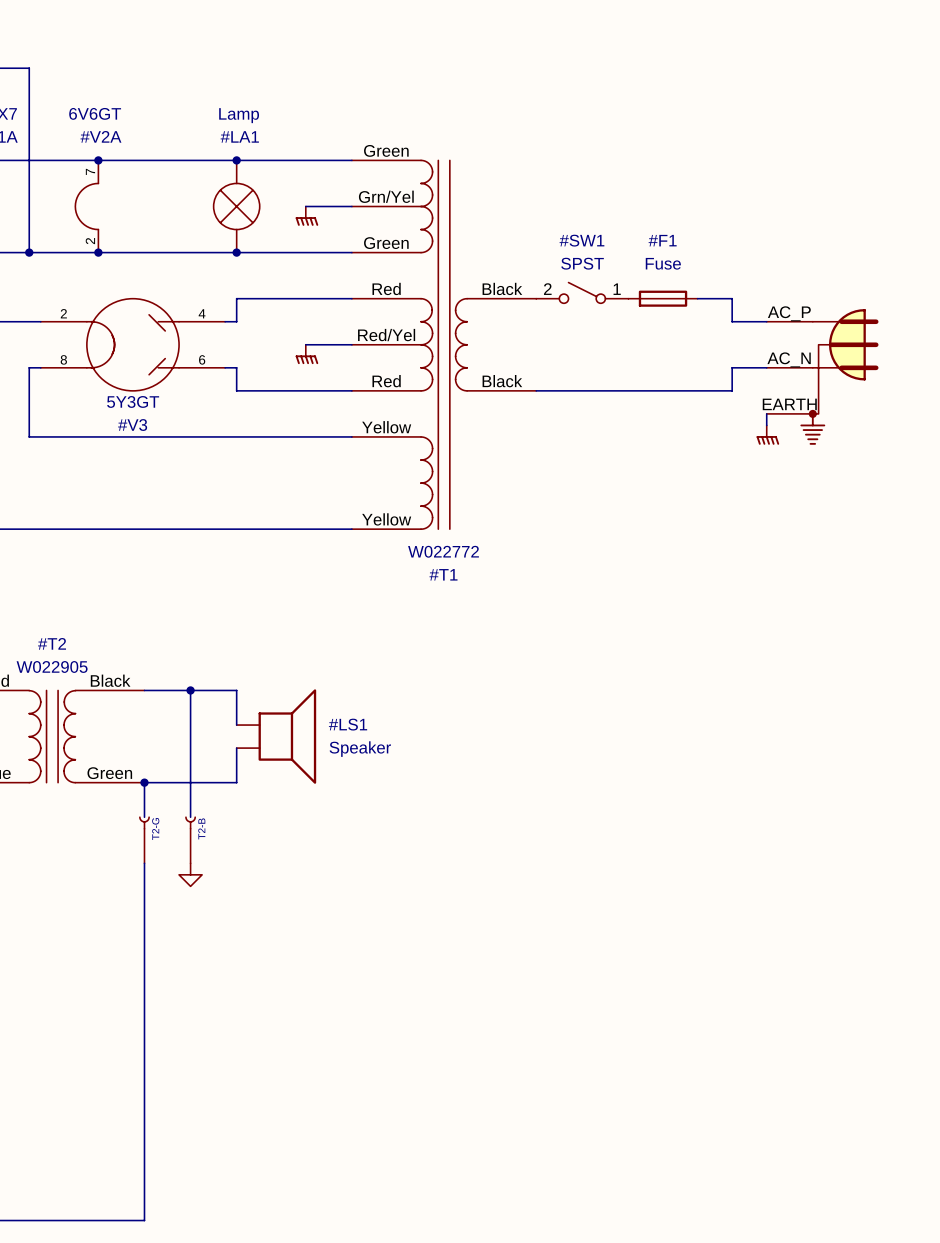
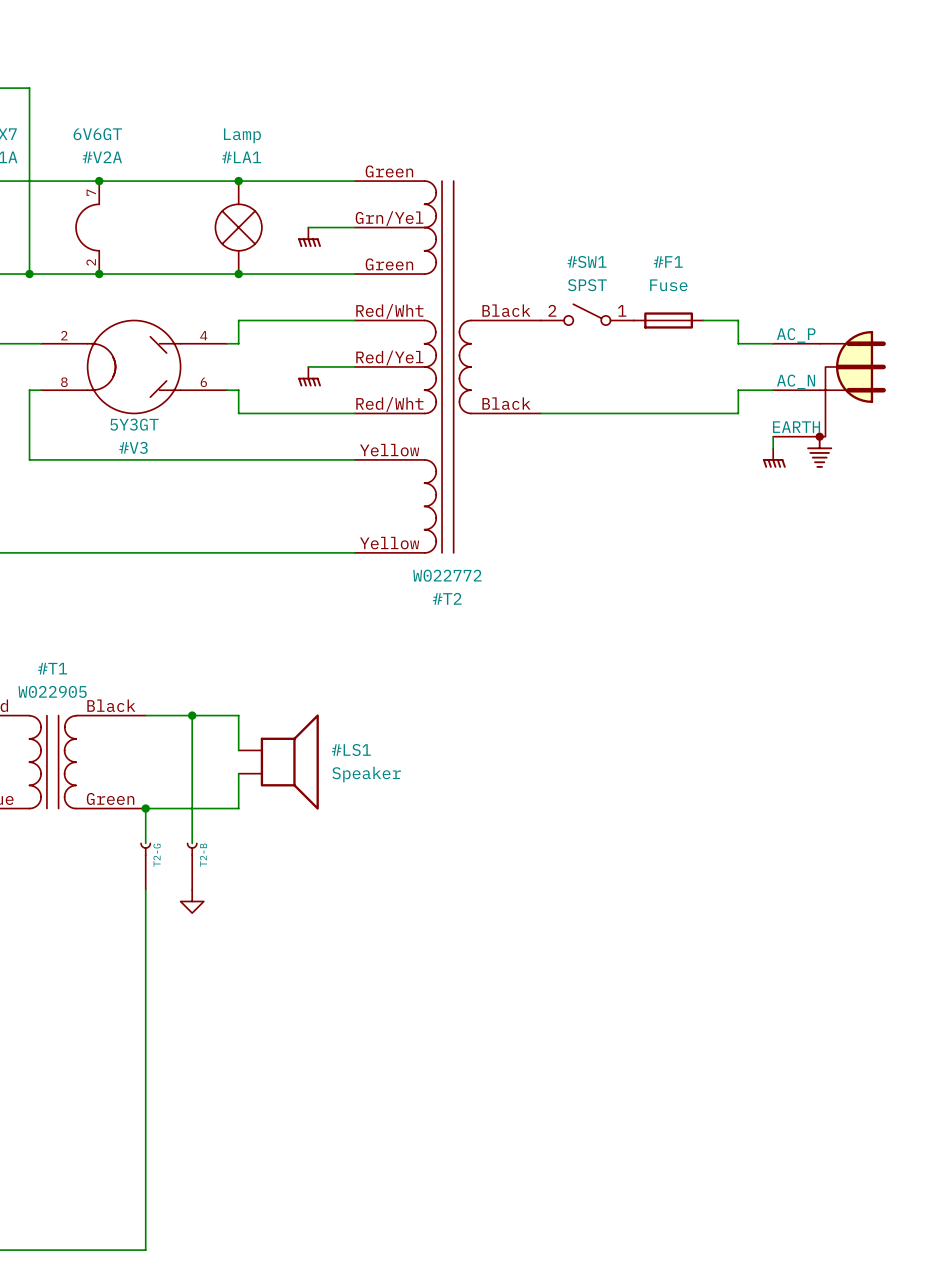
#T1 pin number: Red (386, 288) -> Red/Wht (389, 311)
#T1 pin number: Red (386, 381) -> Red/Wht (389, 404)
#T1 name: #T1 (443, 574) -> #T2 (447, 598)
#T2 name: #T2 (52, 643) -> #T1 (52, 668)

